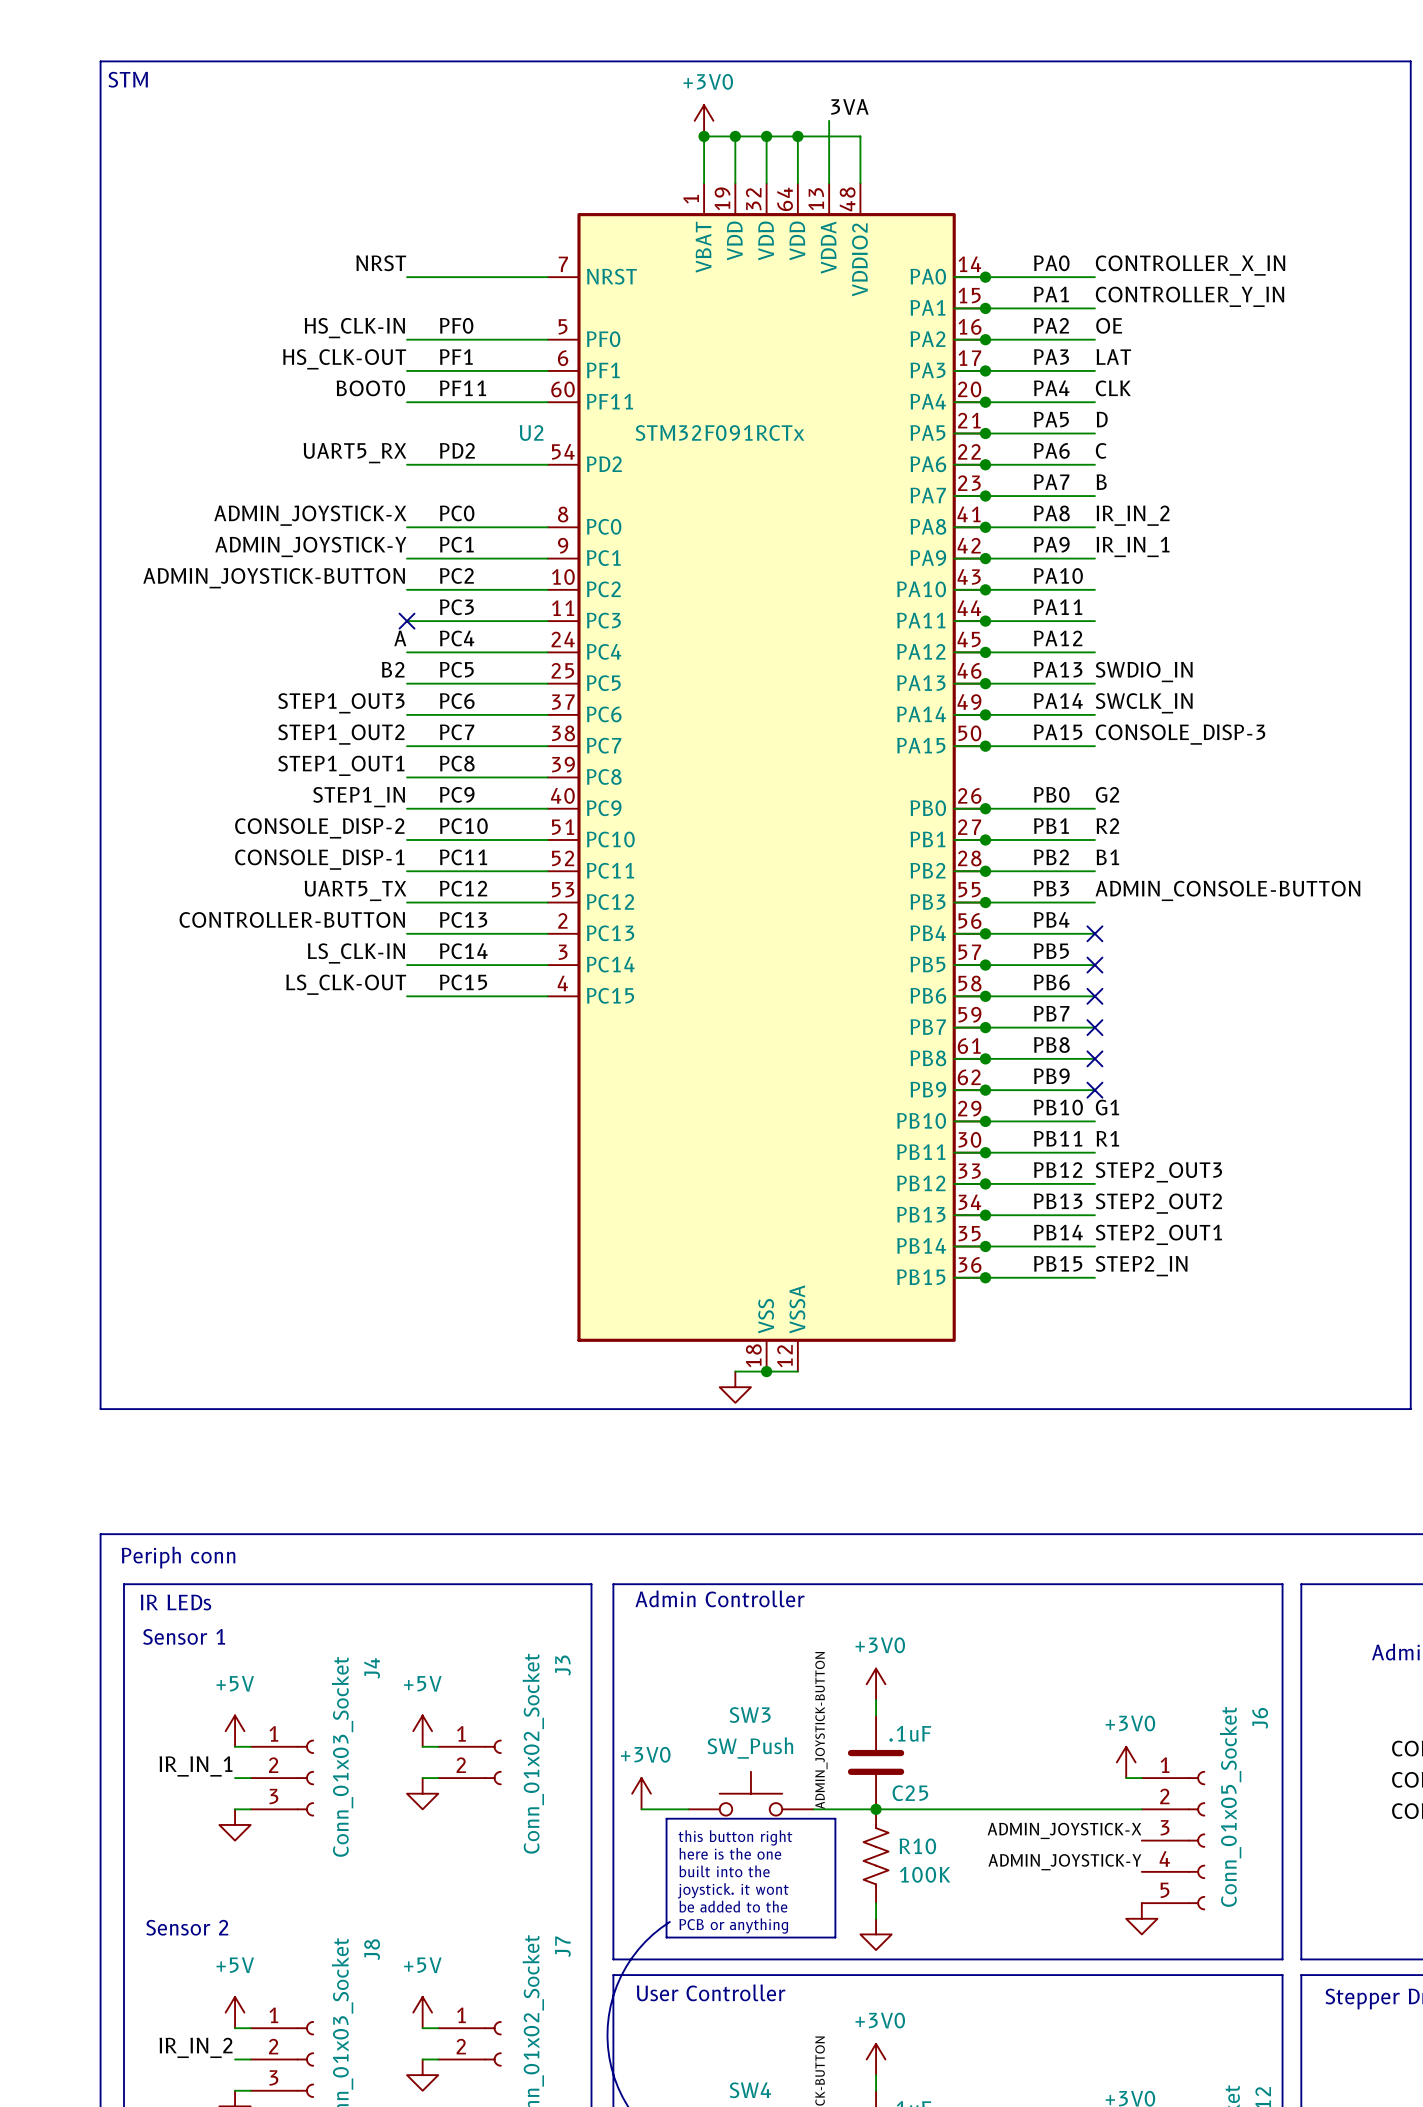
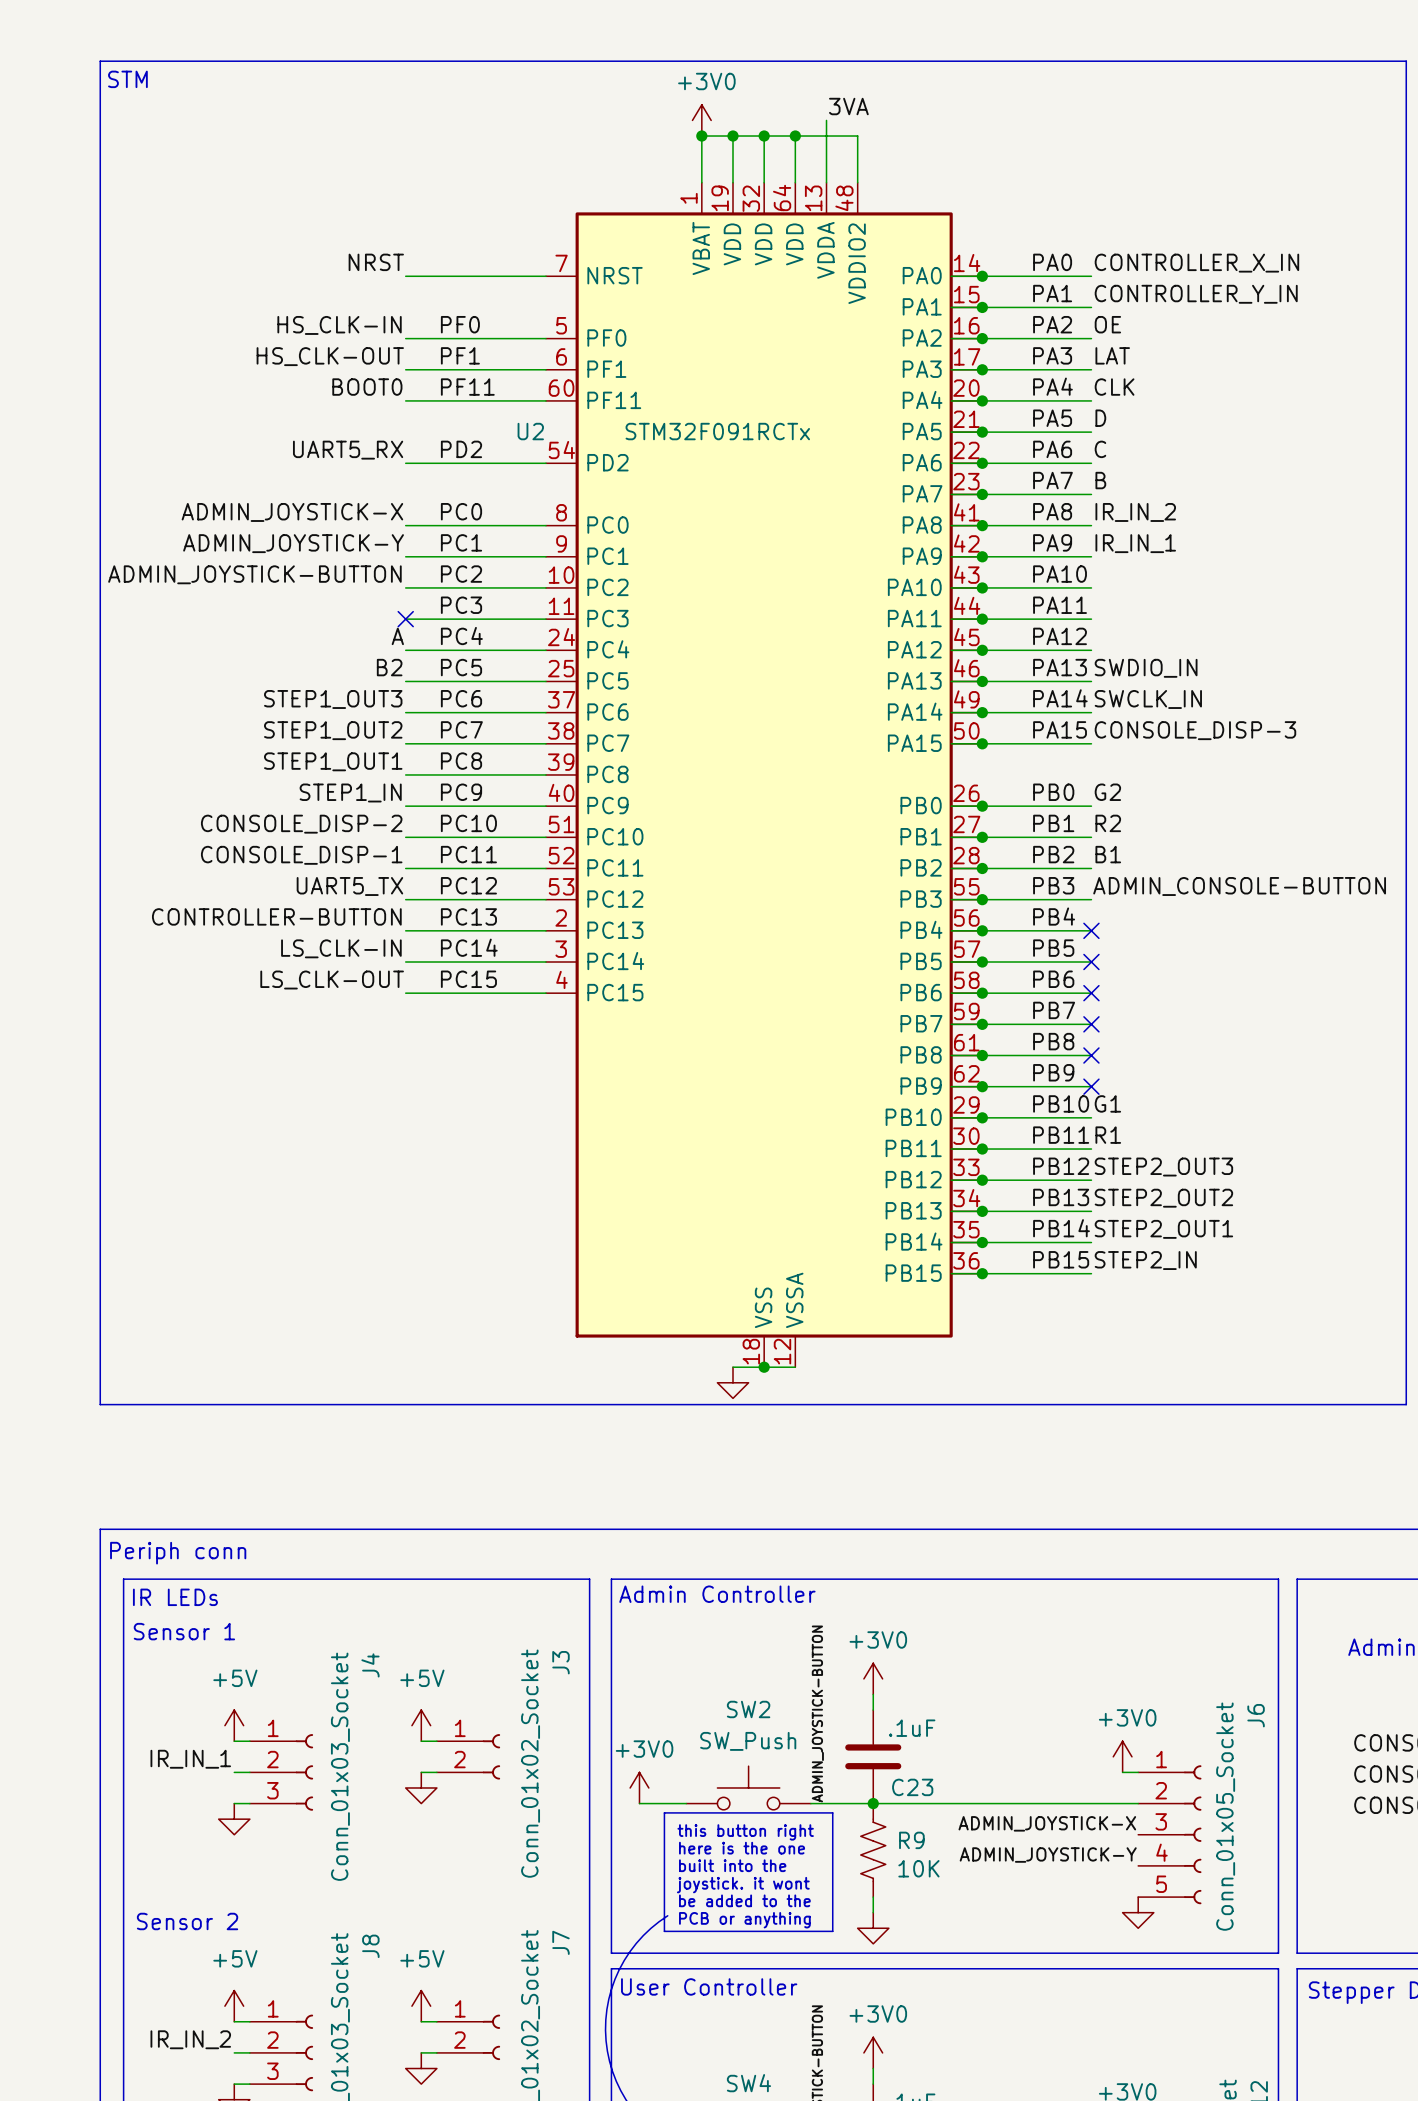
SW3 name: SW3 (750, 1715) -> SW2 (748, 1709)
C25 name: C25 (910, 1793) -> C23 (912, 1787)
R10 name: R10 (917, 1846) -> R9 (911, 1840)
R10 value: 100K (925, 1874) -> 10K (918, 1868)

